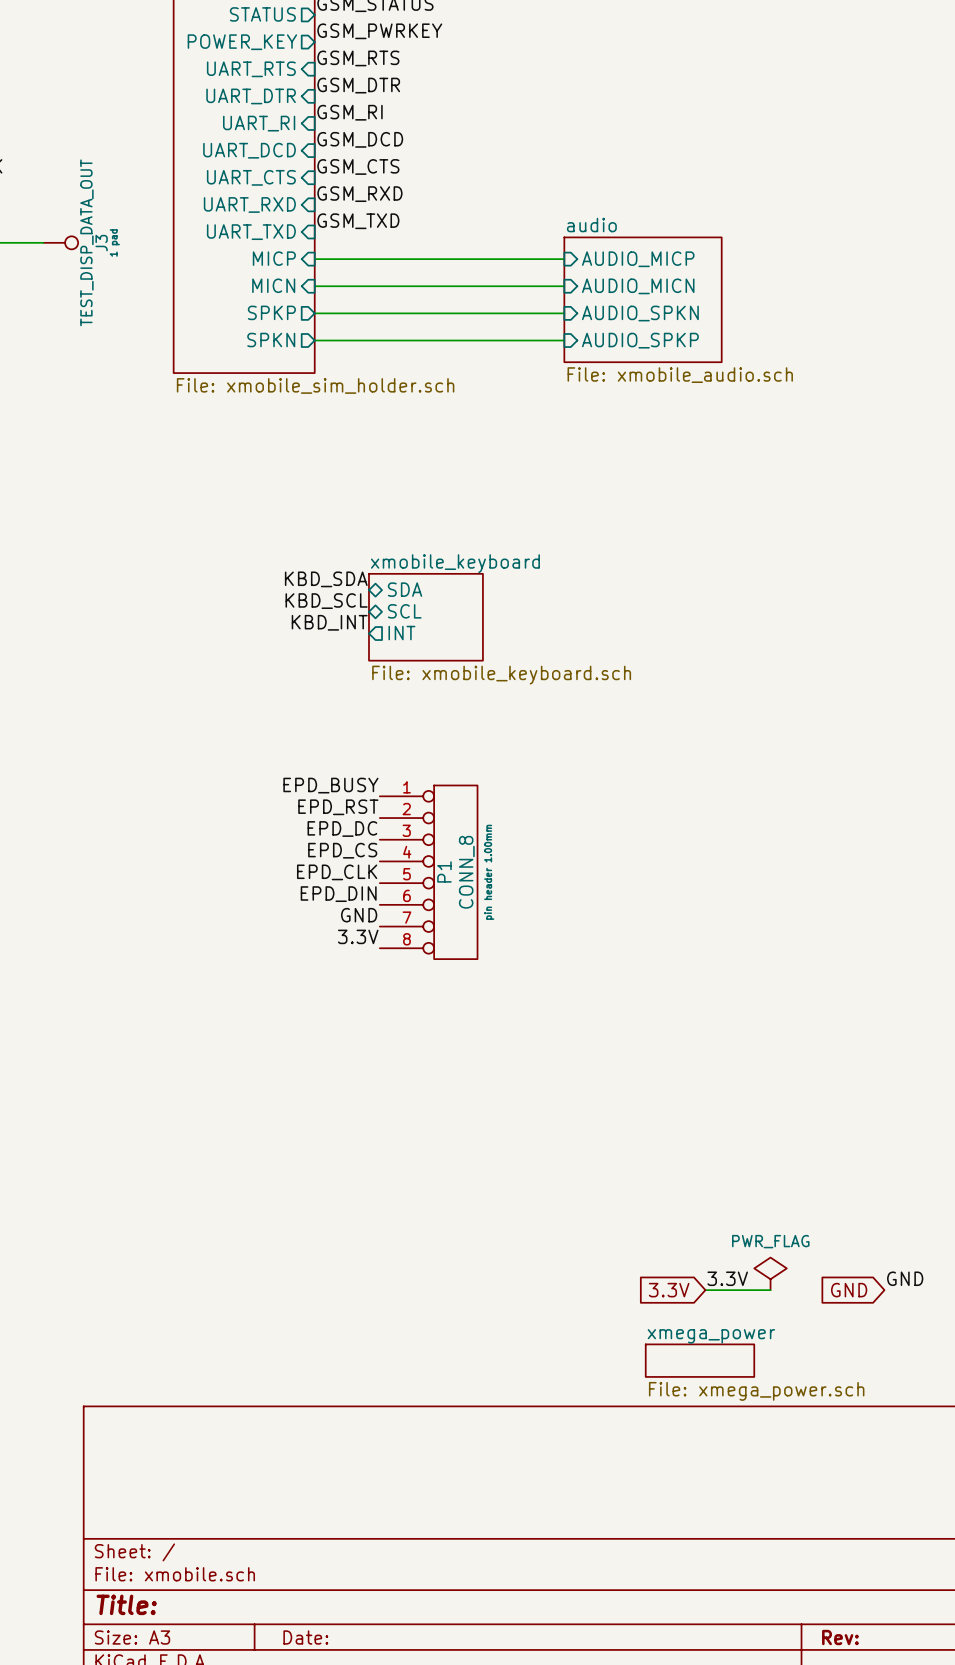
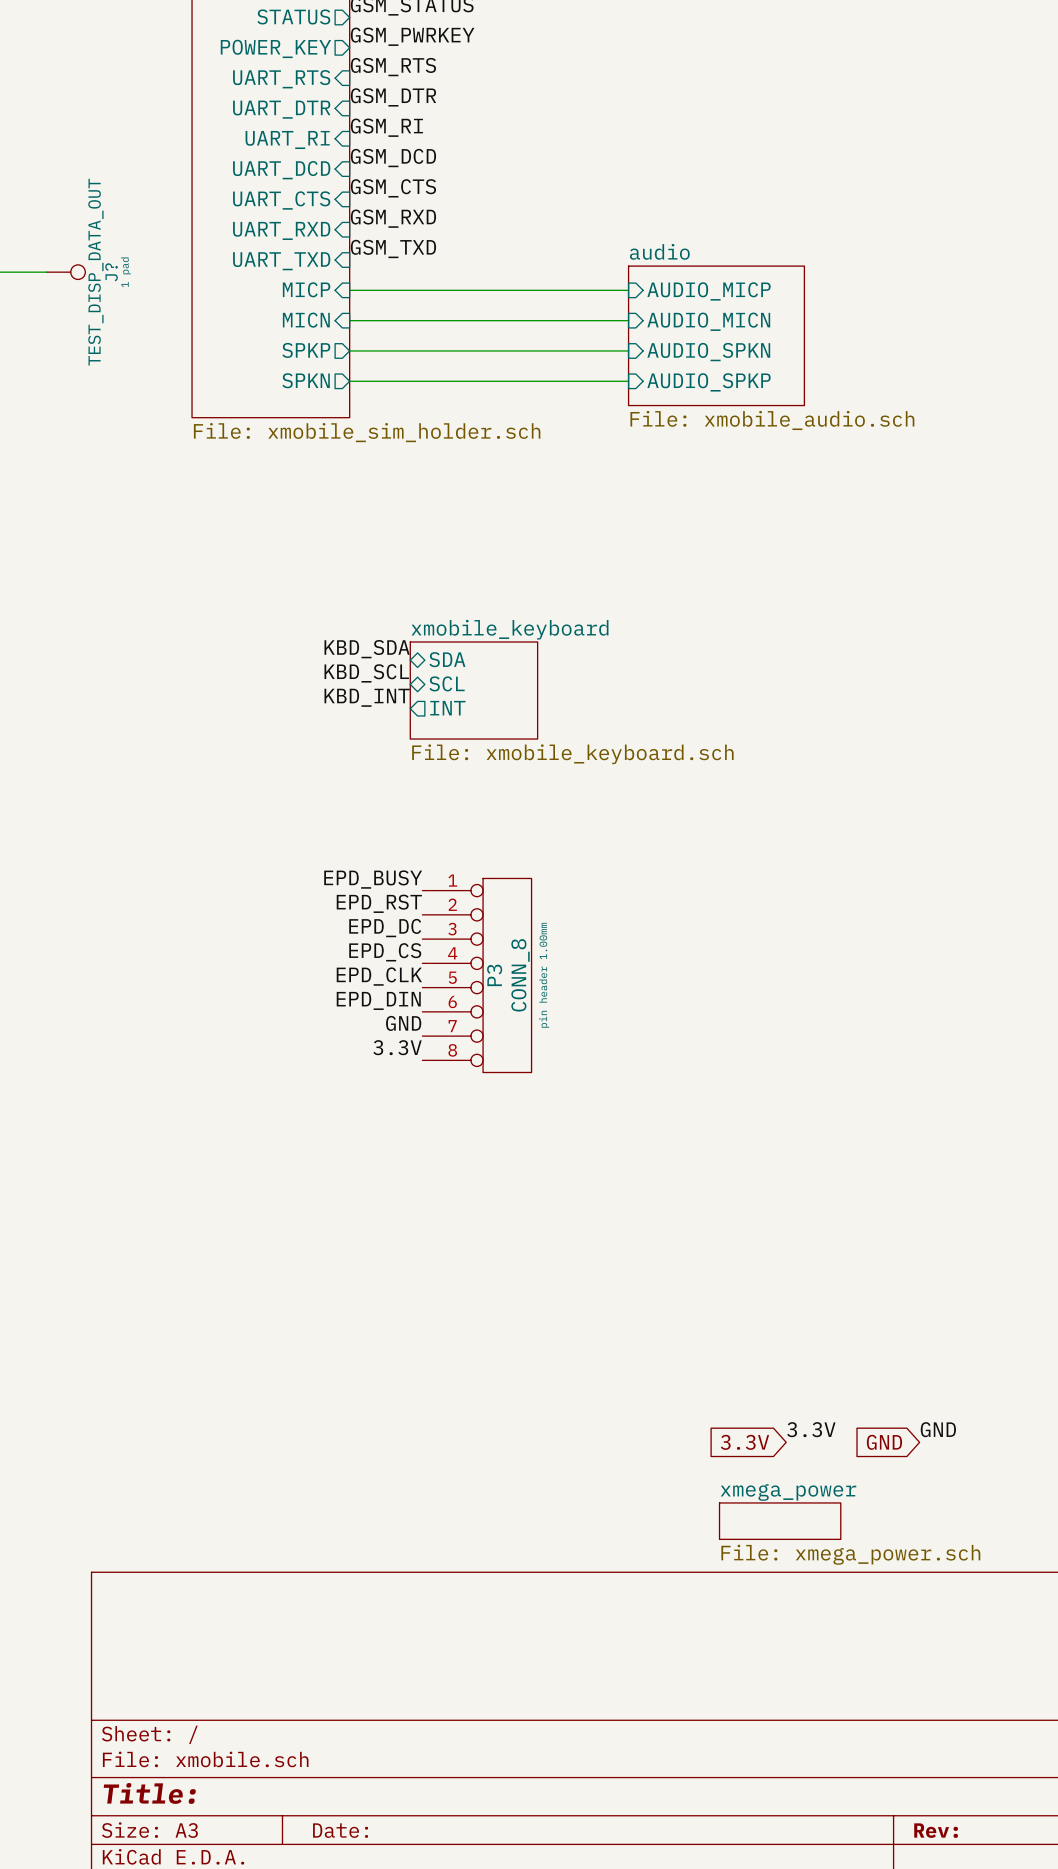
J3 name: J3 (101, 243) -> J? (111, 272)
P1 name: P1 (444, 871) -> P3 (494, 975)
power symbol: PWR_FLAG (770, 1273) -> none
label position: GND (905, 1278) -> GND (938, 1429)
wire: (705, 1290) (770, 1290) -> none
global label position: GND (849, 1290) -> GND (884, 1442)

